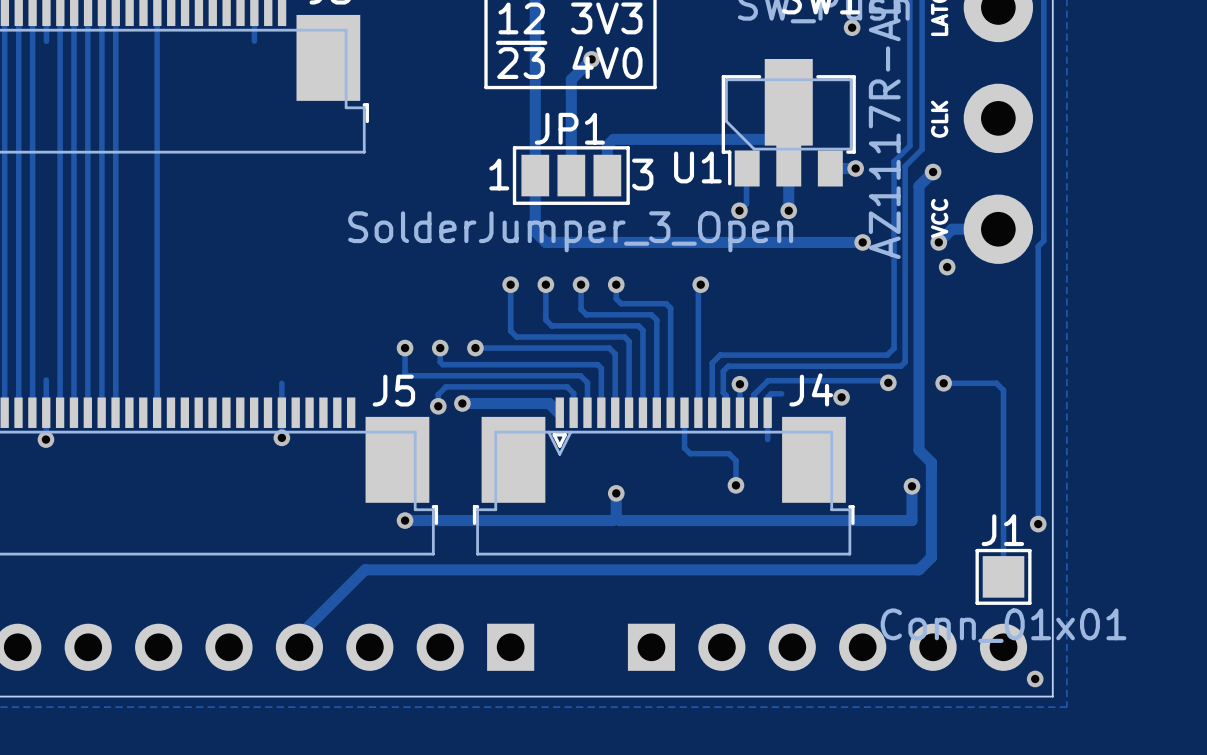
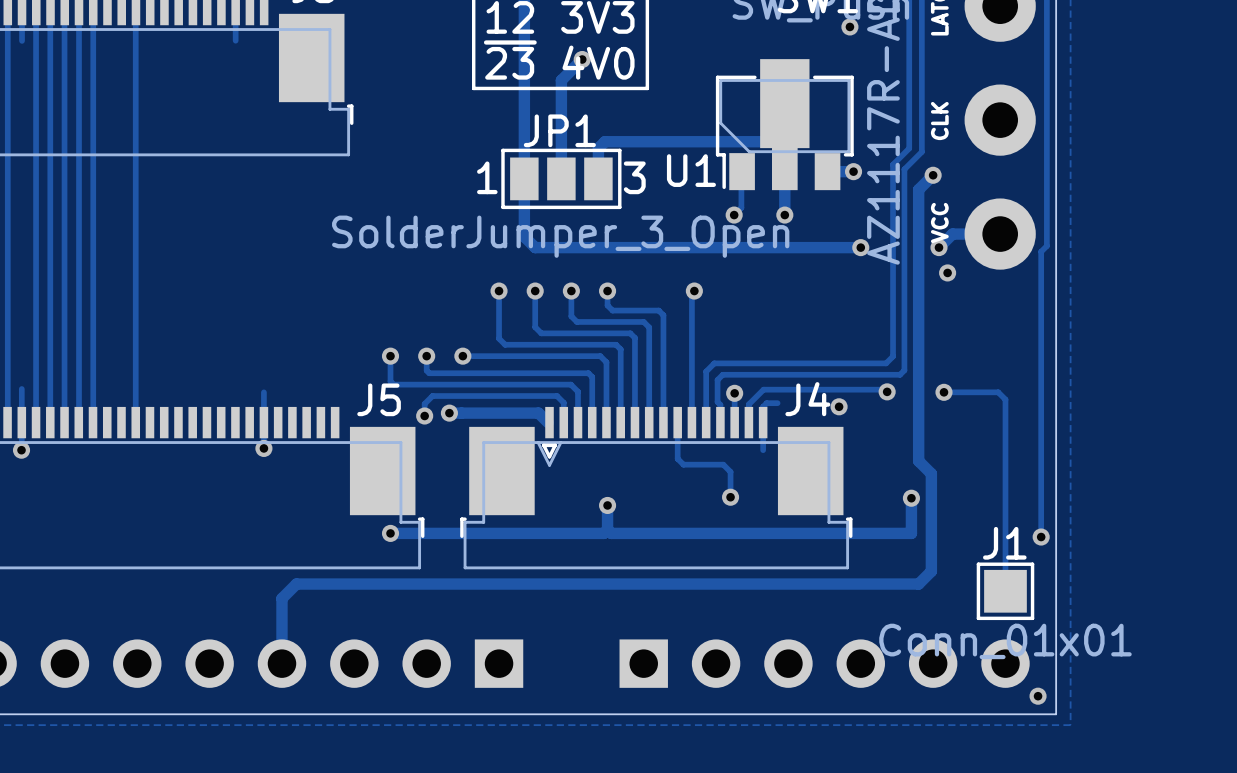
track: (365, 569) (299, 635) -> (349, 584) (296, 584) (281, 598) (281, 651)

